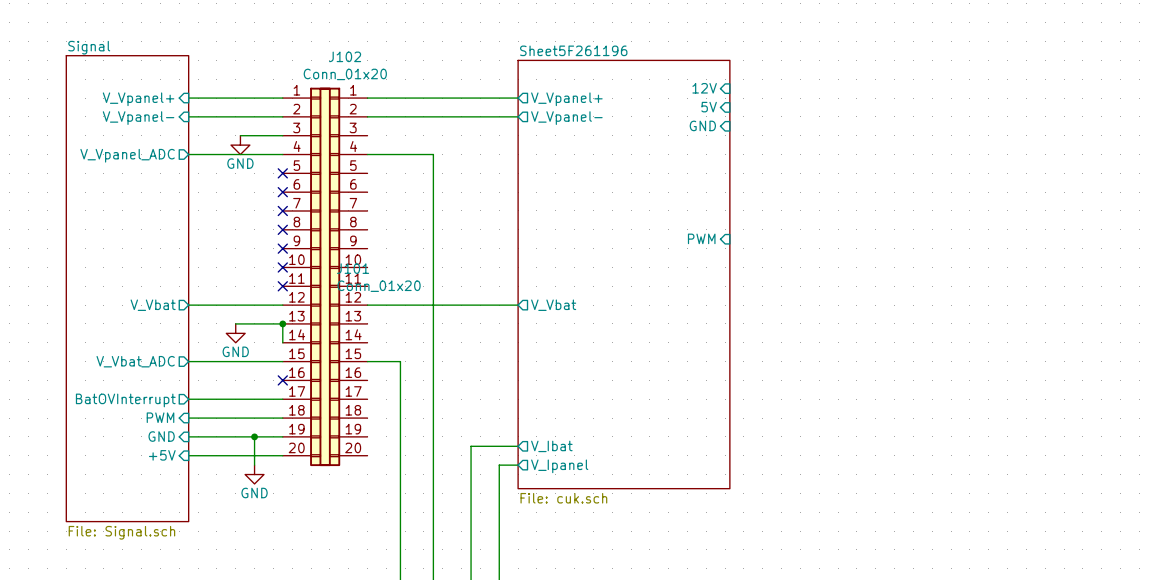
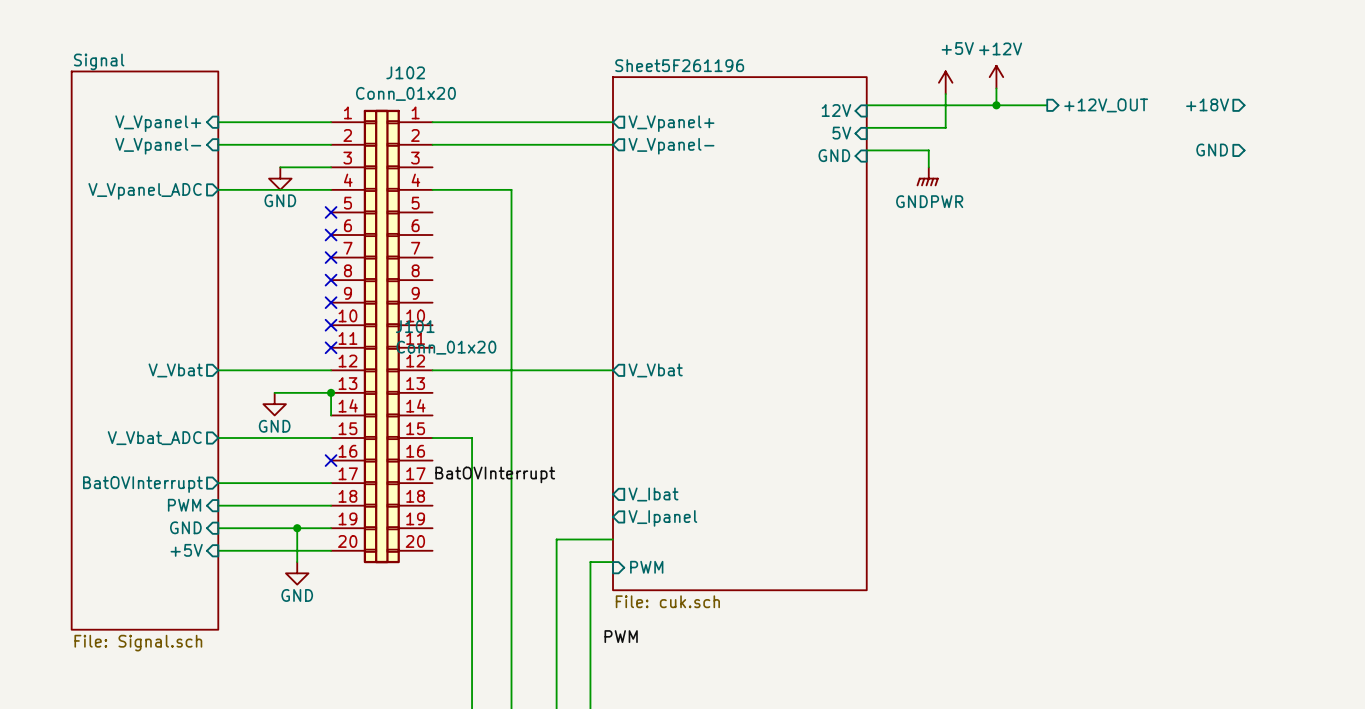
power symbol: none -> +12V (996, 77)
power symbol: none -> +5V (945, 82)
wire: none -> (996, 88) (996, 105)
wire: none -> (945, 94) (945, 127) (866, 127)
wire: none -> (866, 105) (1047, 105)
junction: none -> (996, 105)
sheet pin: none -> +18V (1207, 104)
sheet pin: none -> +12V_OUT (1106, 105)
wire: none -> (866, 150) (928, 150) (928, 167)
sheet pin: none -> GND (1212, 150)
power symbol: none -> GNDPWR (927, 176)
sheet pin: PWM (701, 238) -> none
label: none -> BatOVInterrupt (495, 474)
sheet pin position: V_Ibat (551, 446) -> V_Ibat (653, 494)
sheet pin position: V_Ipanel (559, 466) -> V_Ipanel (662, 518)
sheet pin: none -> PWM (646, 567)
label: none -> PWM (621, 636)

